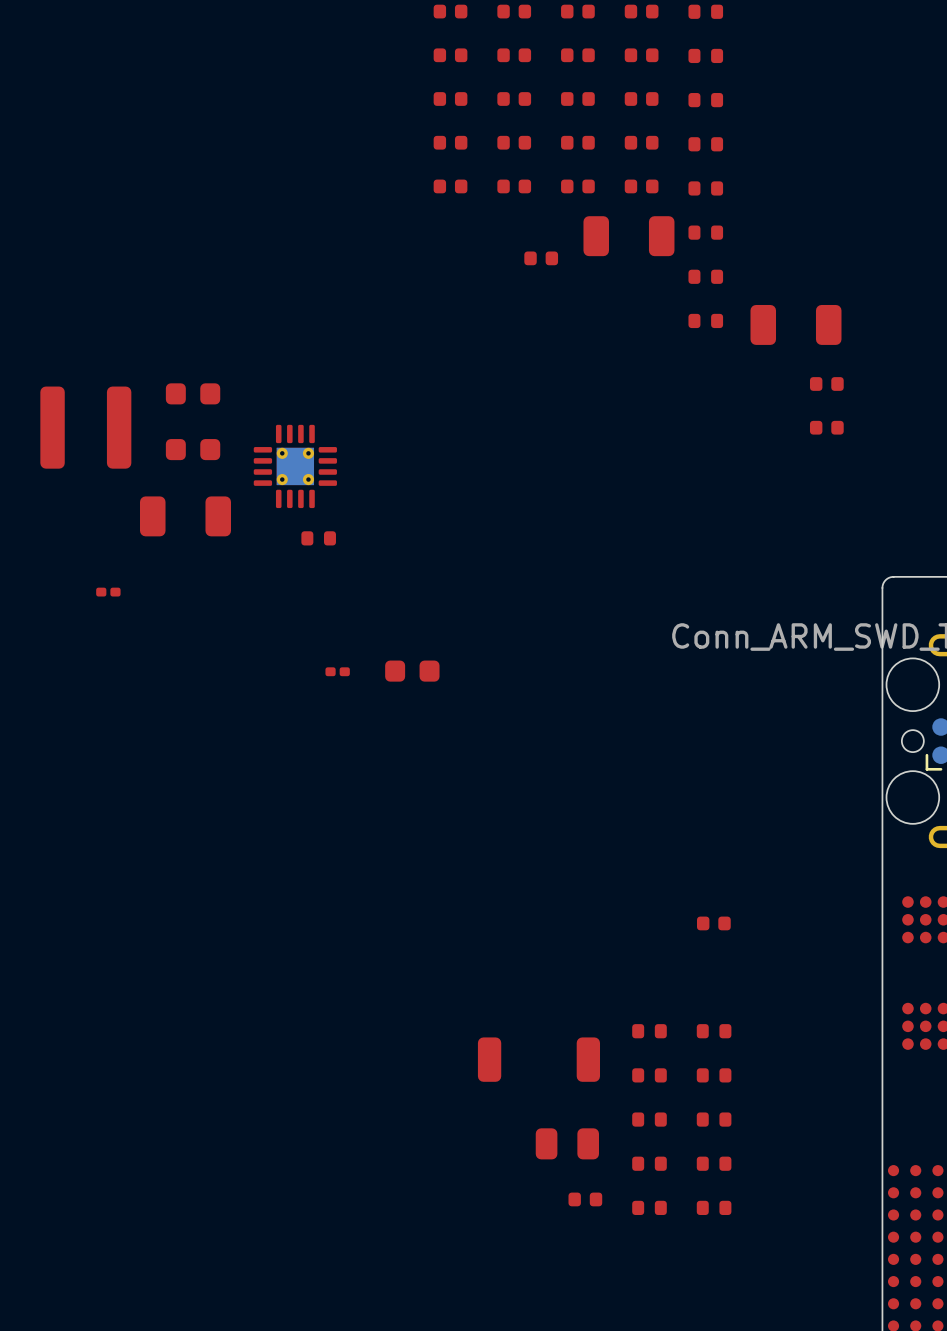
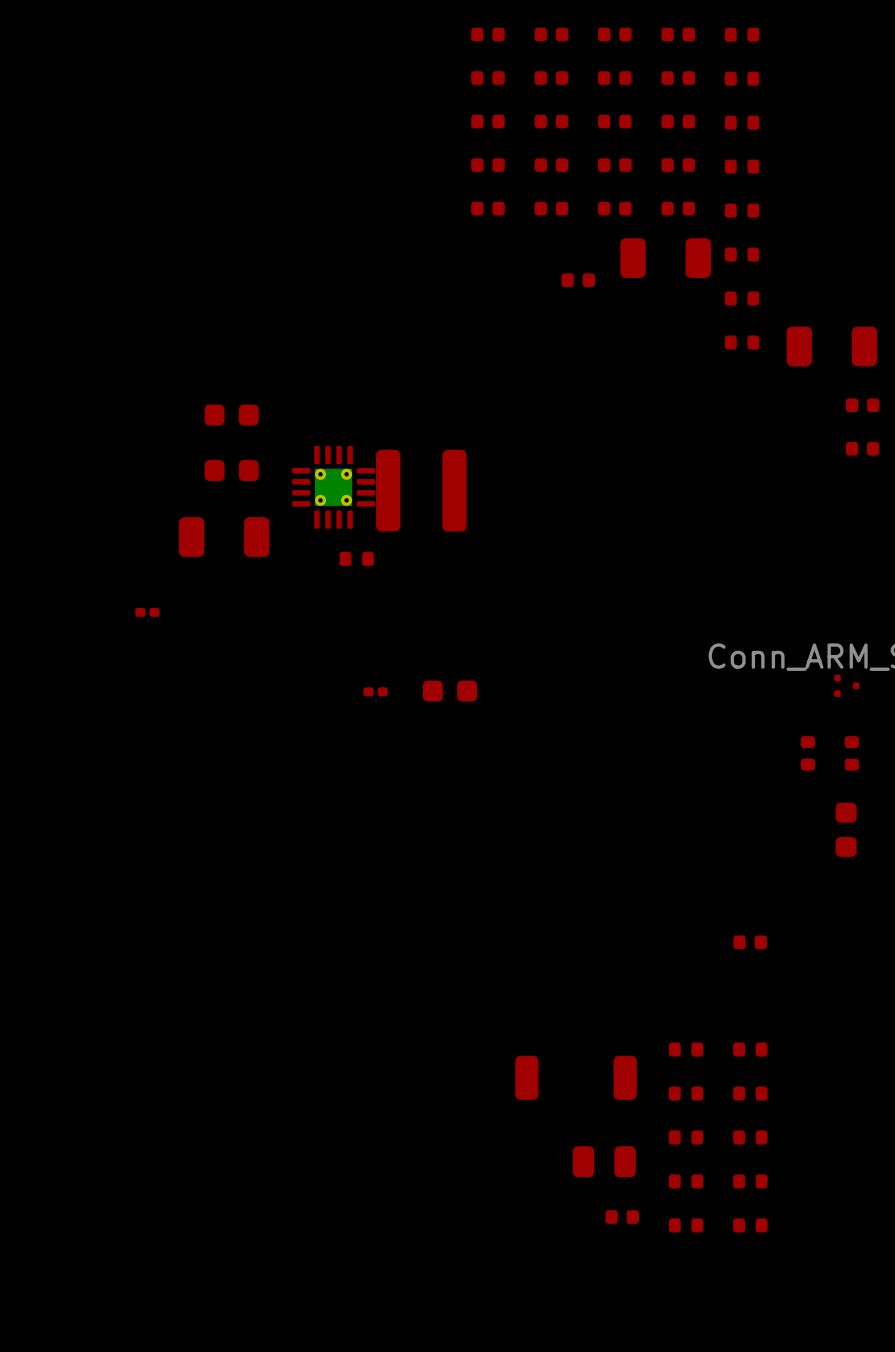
part position: (85, 427) -> (421, 490)
part: none -> (846, 685)
part: none -> (807, 753)
part: none -> (851, 753)
part: none -> (846, 829)

